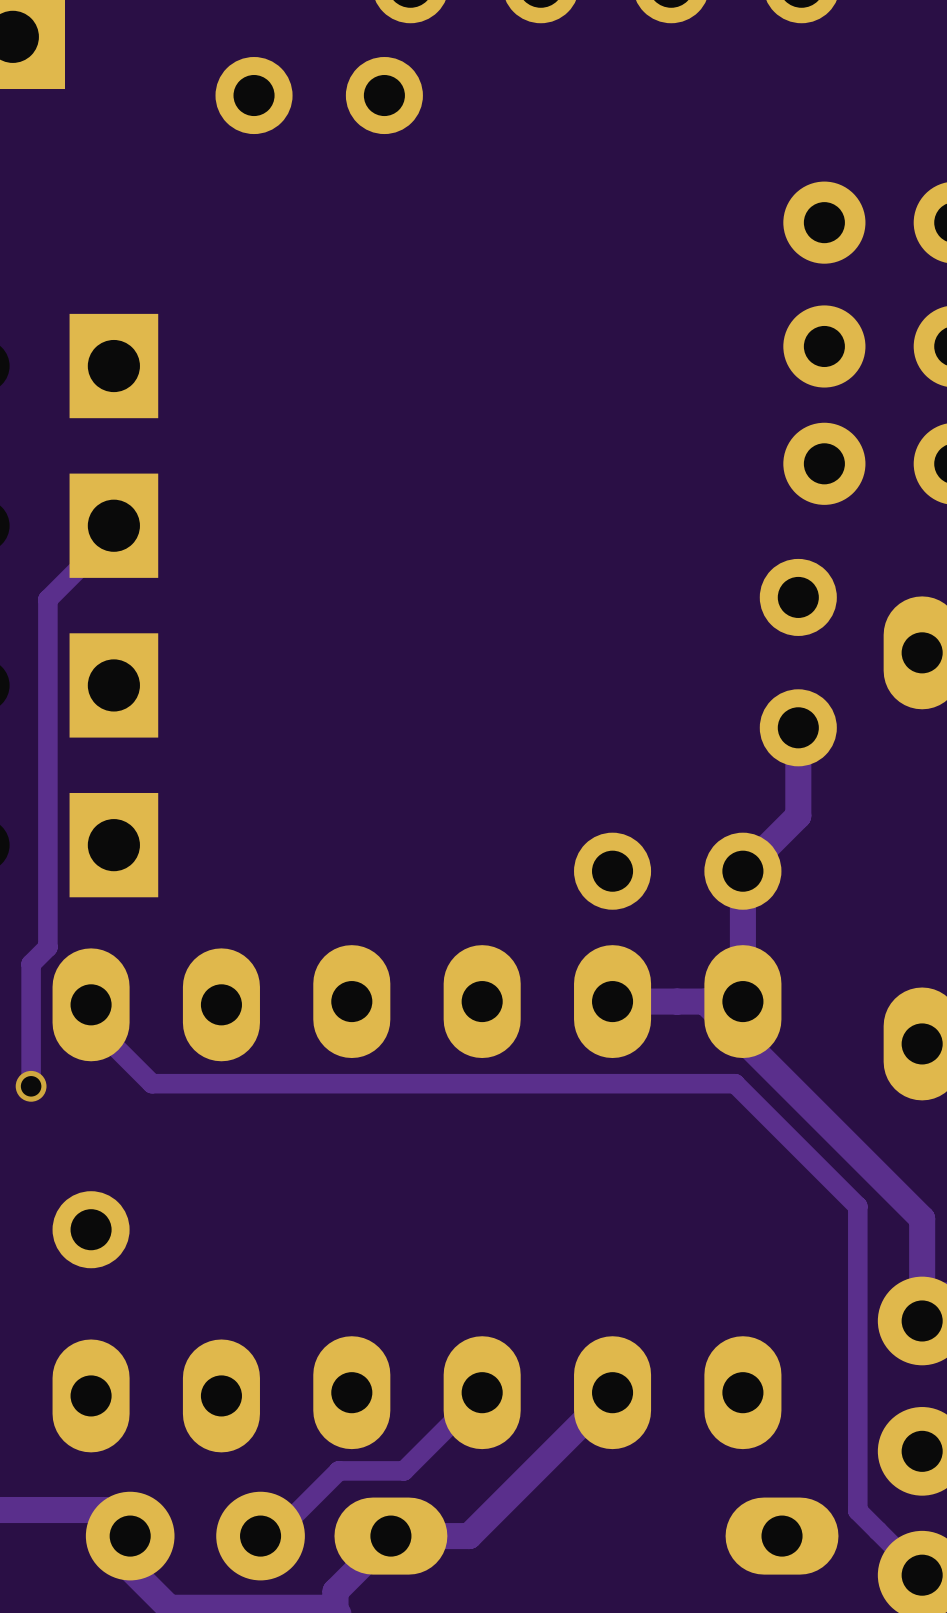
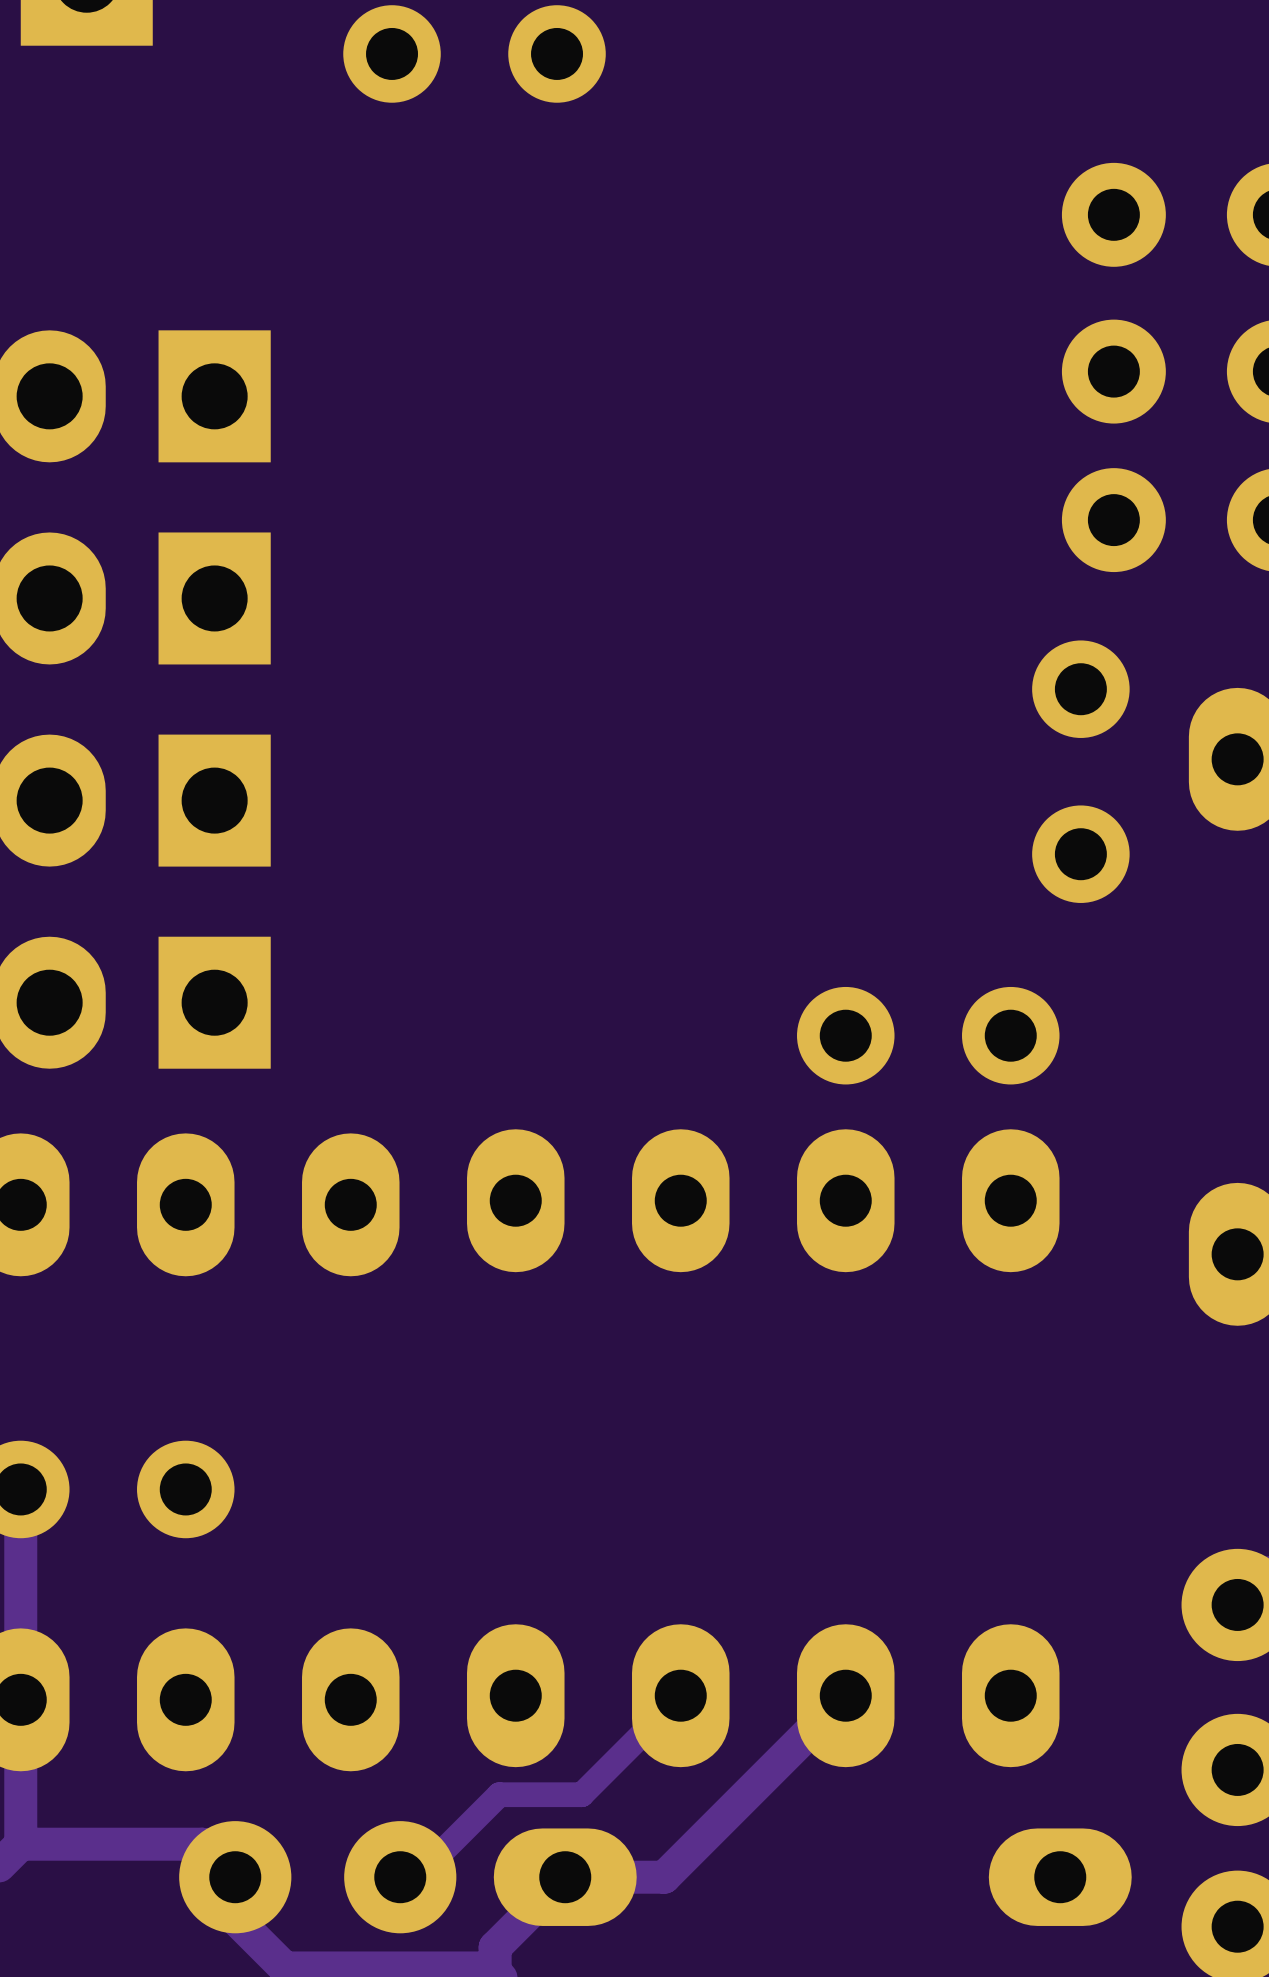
track: (113, 525) (113, 533) (47, 599) (47, 947) (31, 964) (31, 1086) -> none
track: (798, 727) (798, 815) (742, 871) (742, 1001) -> none
track: (612, 1001) (704, 1001) (922, 1218) (922, 1320) -> none
track: (91, 1004) (91, 1022) (152, 1083) (735, 1083) (857, 1206) (857, 1510) (922, 1575) -> none
via: (31, 1086) -> none

